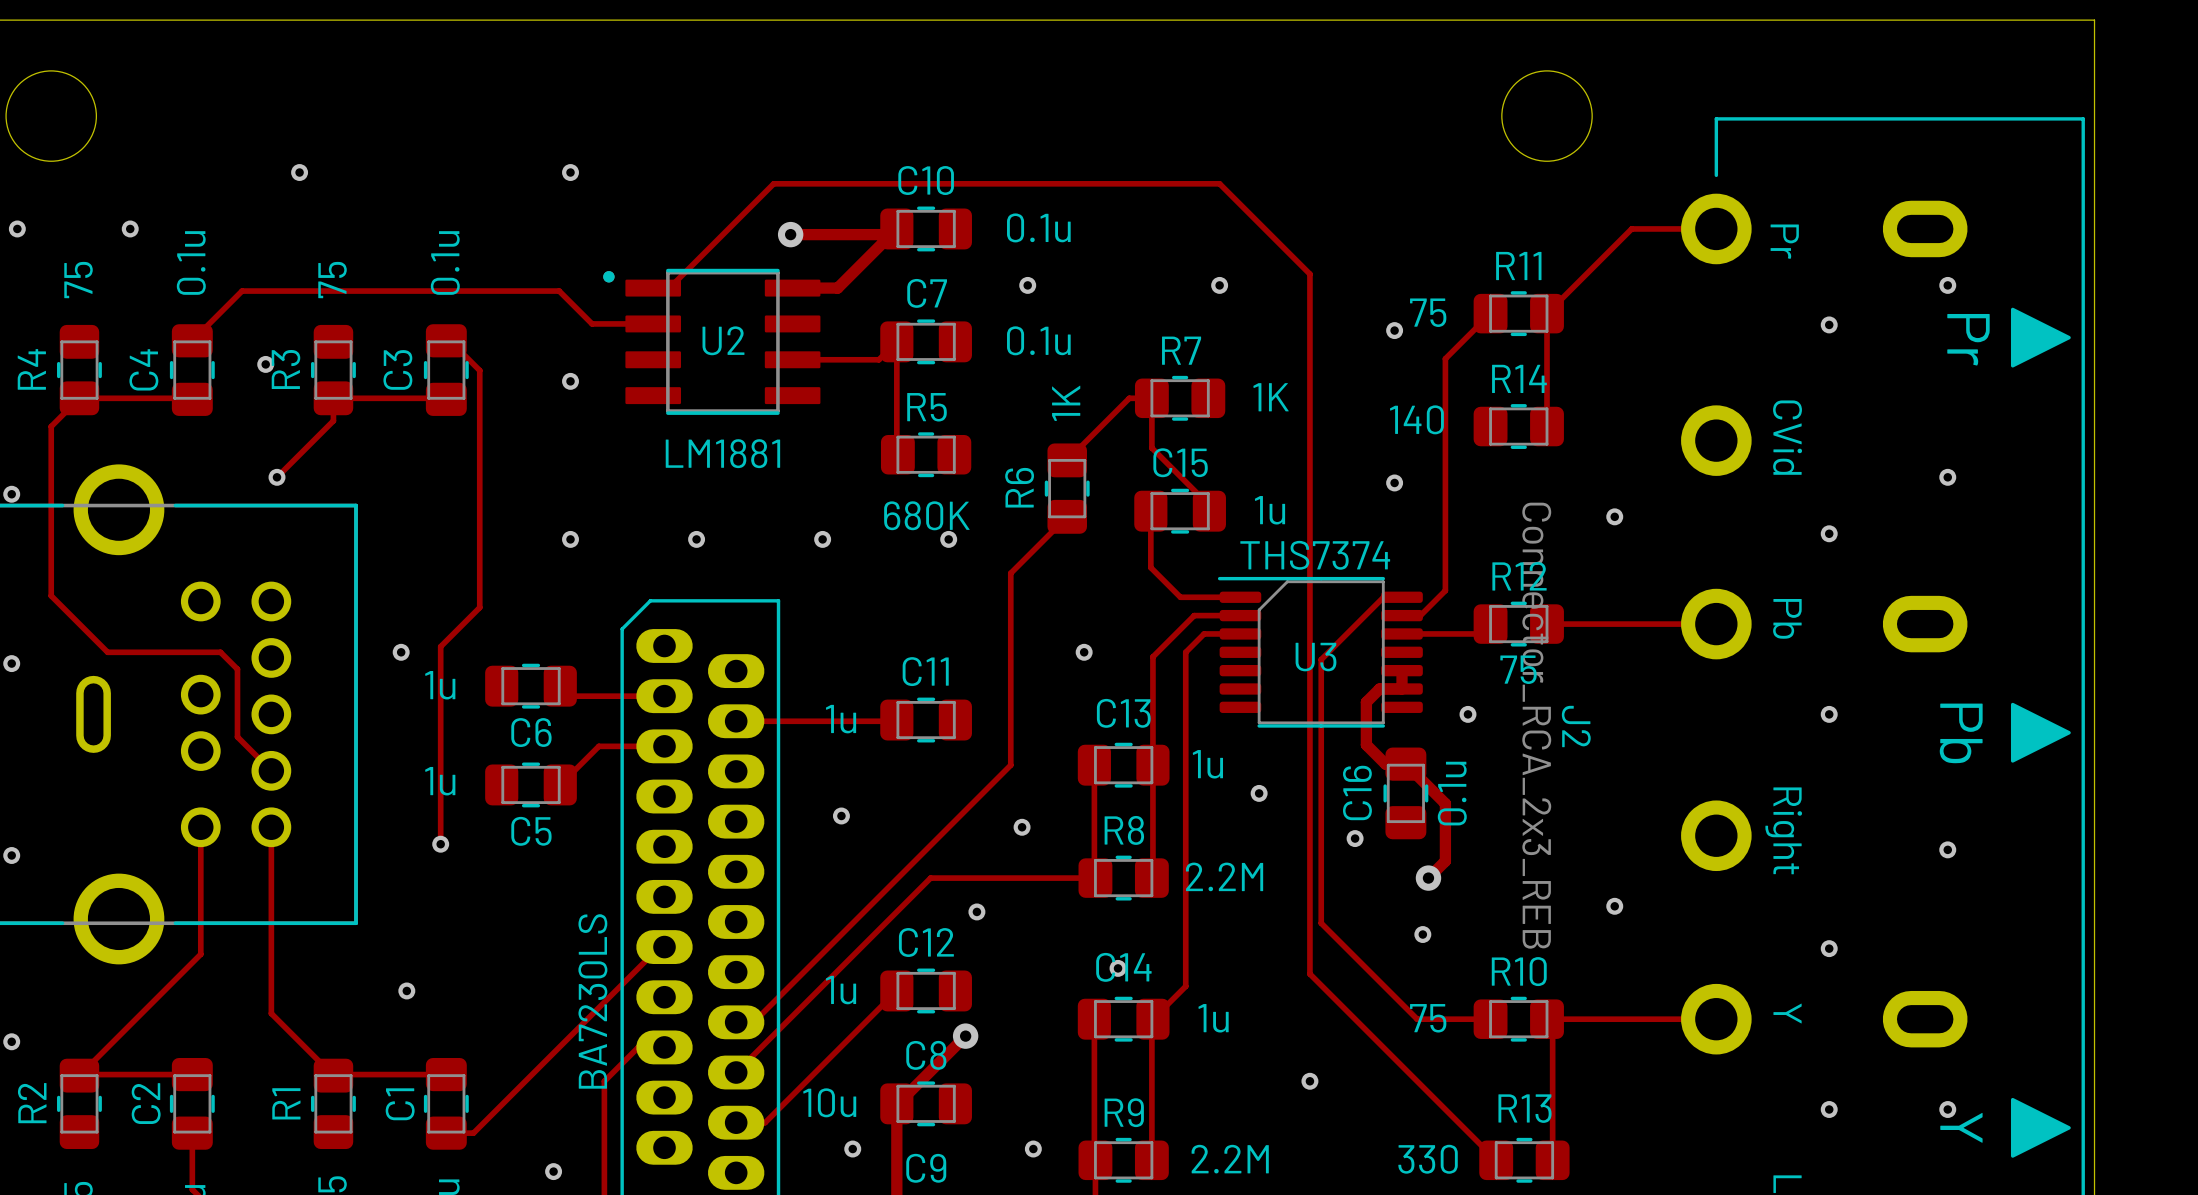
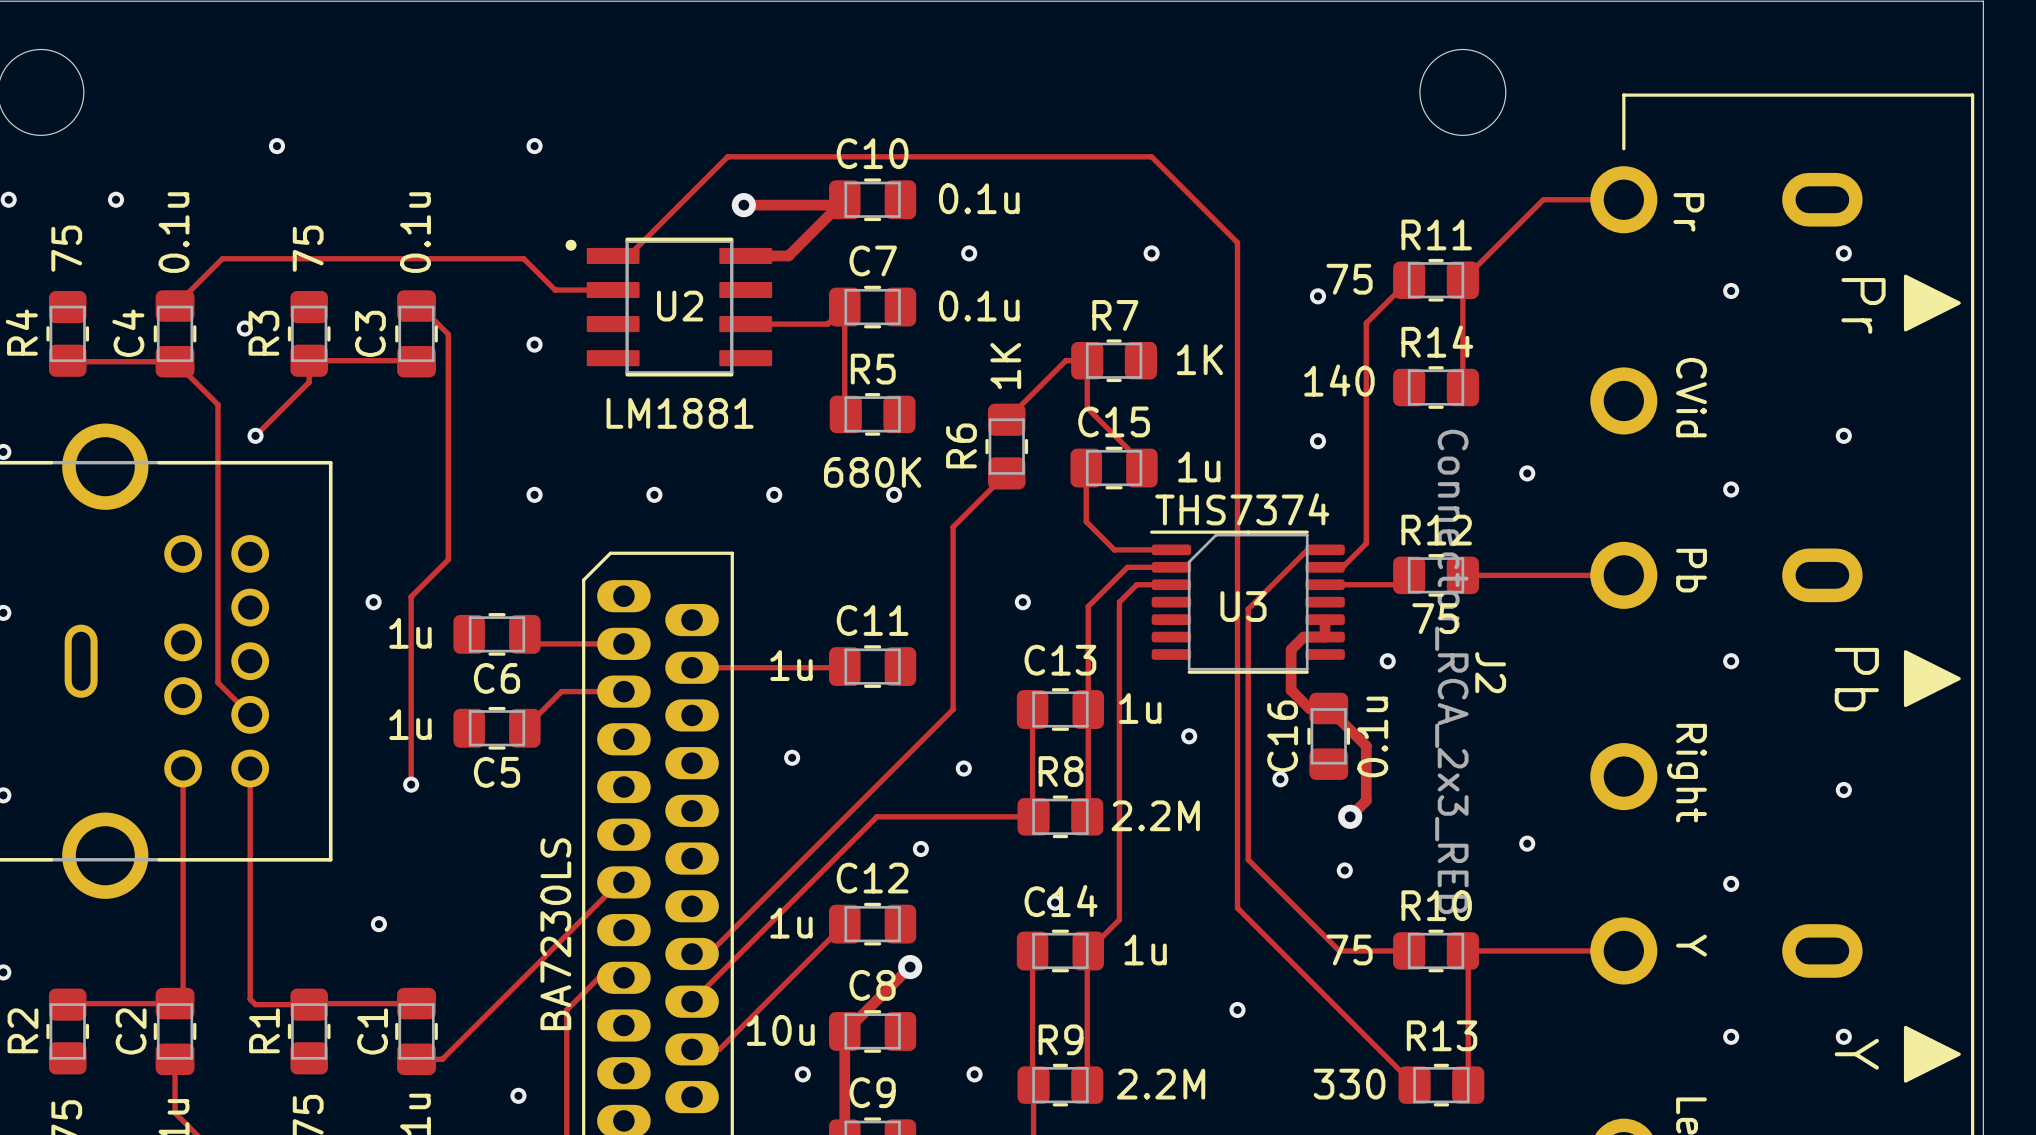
track: (192, 399) (79, 398) (51, 426) (51, 595) (107, 652) (220, 652) (237, 669) -> (67, 360) (175, 361) (217, 404) (217, 618)
track: (200, 954) (80, 1074) -> (183, 889) (183, 995) (175, 1003)
track: (271, 1013) (333, 1075) -> (250, 945) (250, 999) (255, 1004) (309, 1004)

